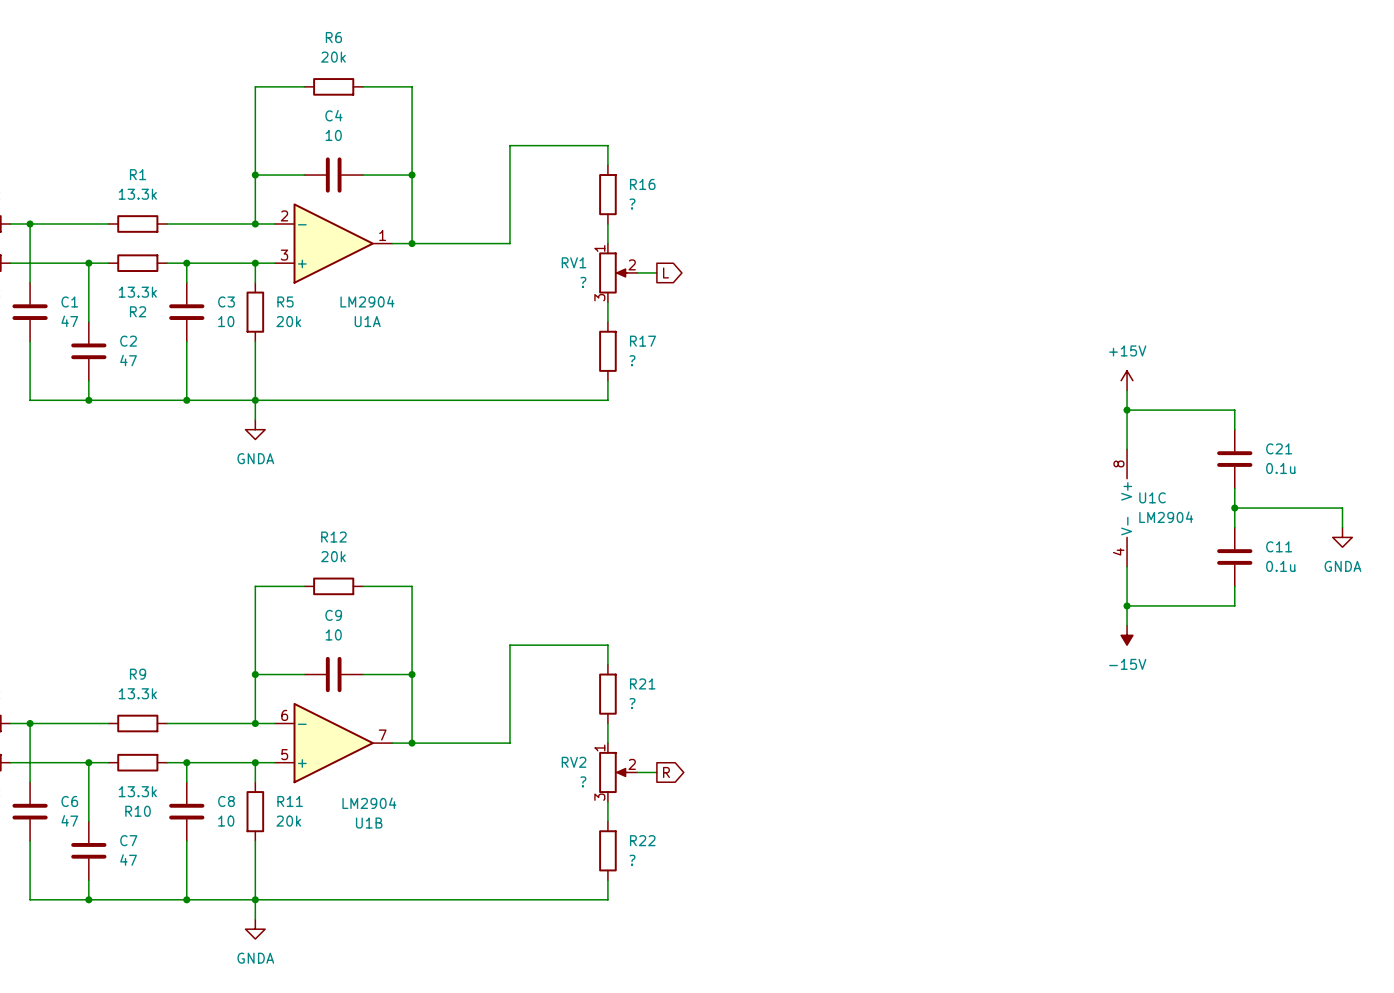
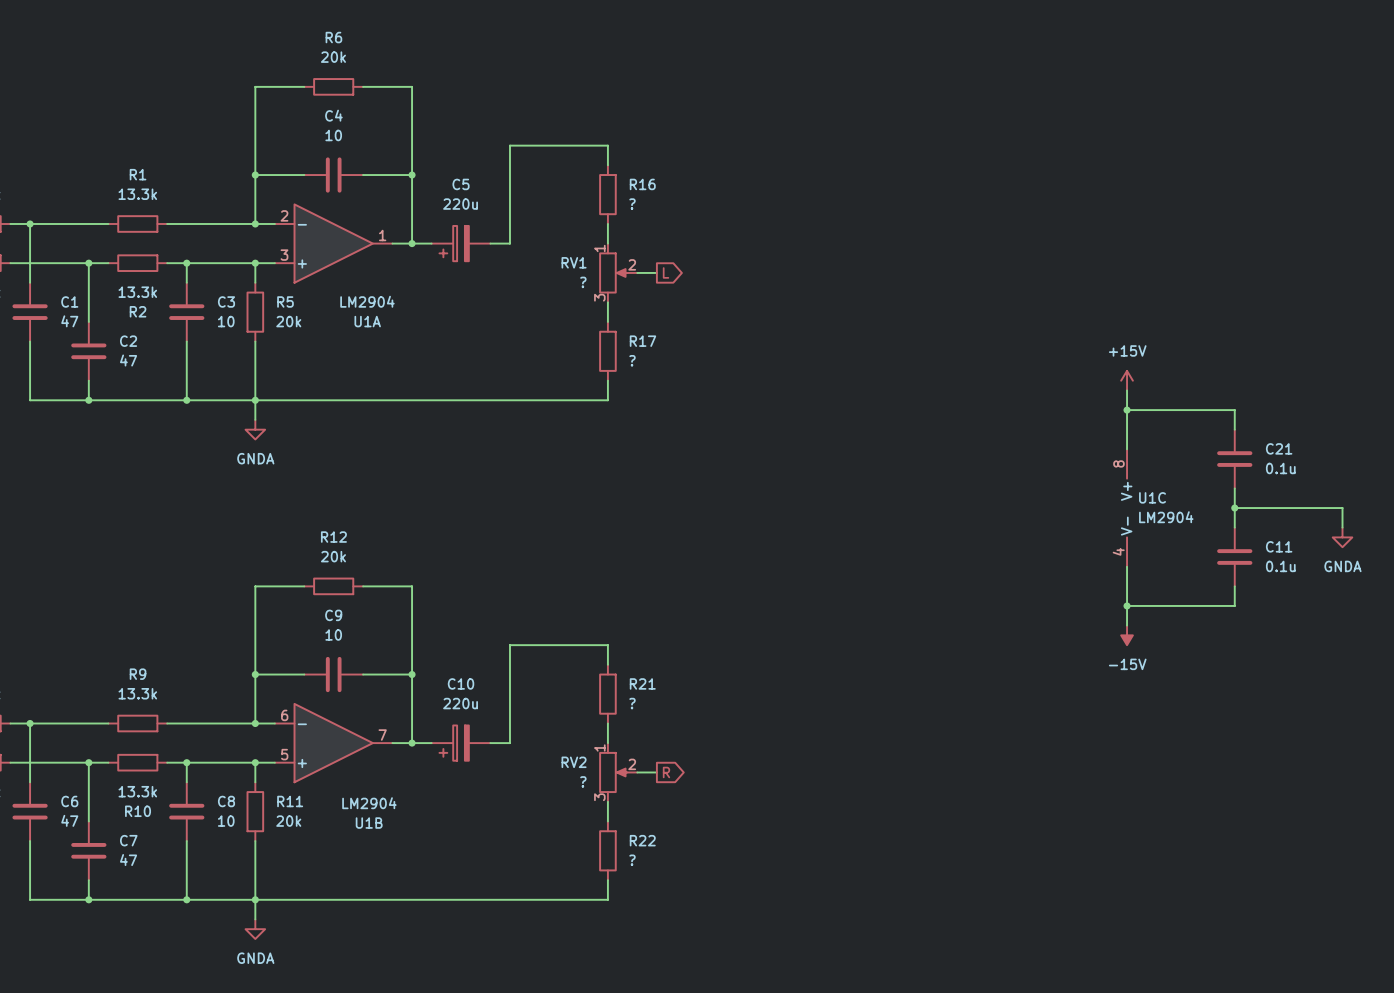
C5: none -> 220u (461, 243)
C10: none -> 220u (461, 743)

